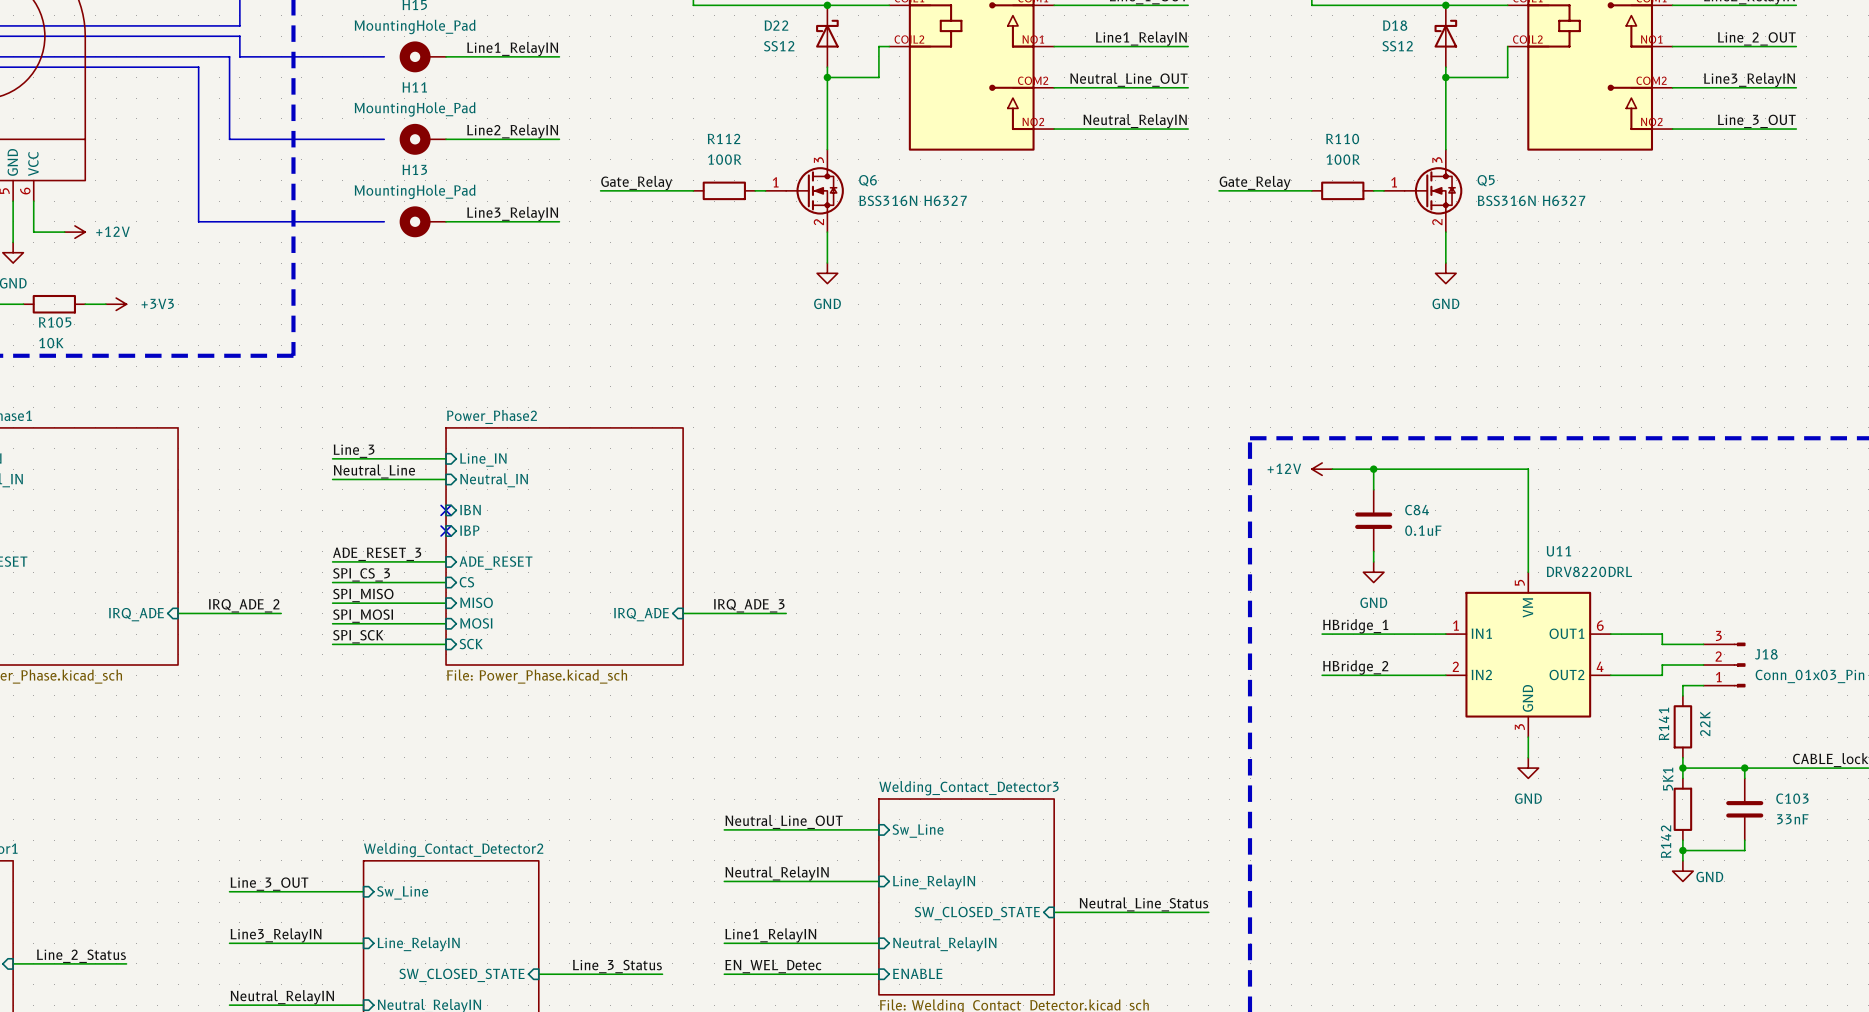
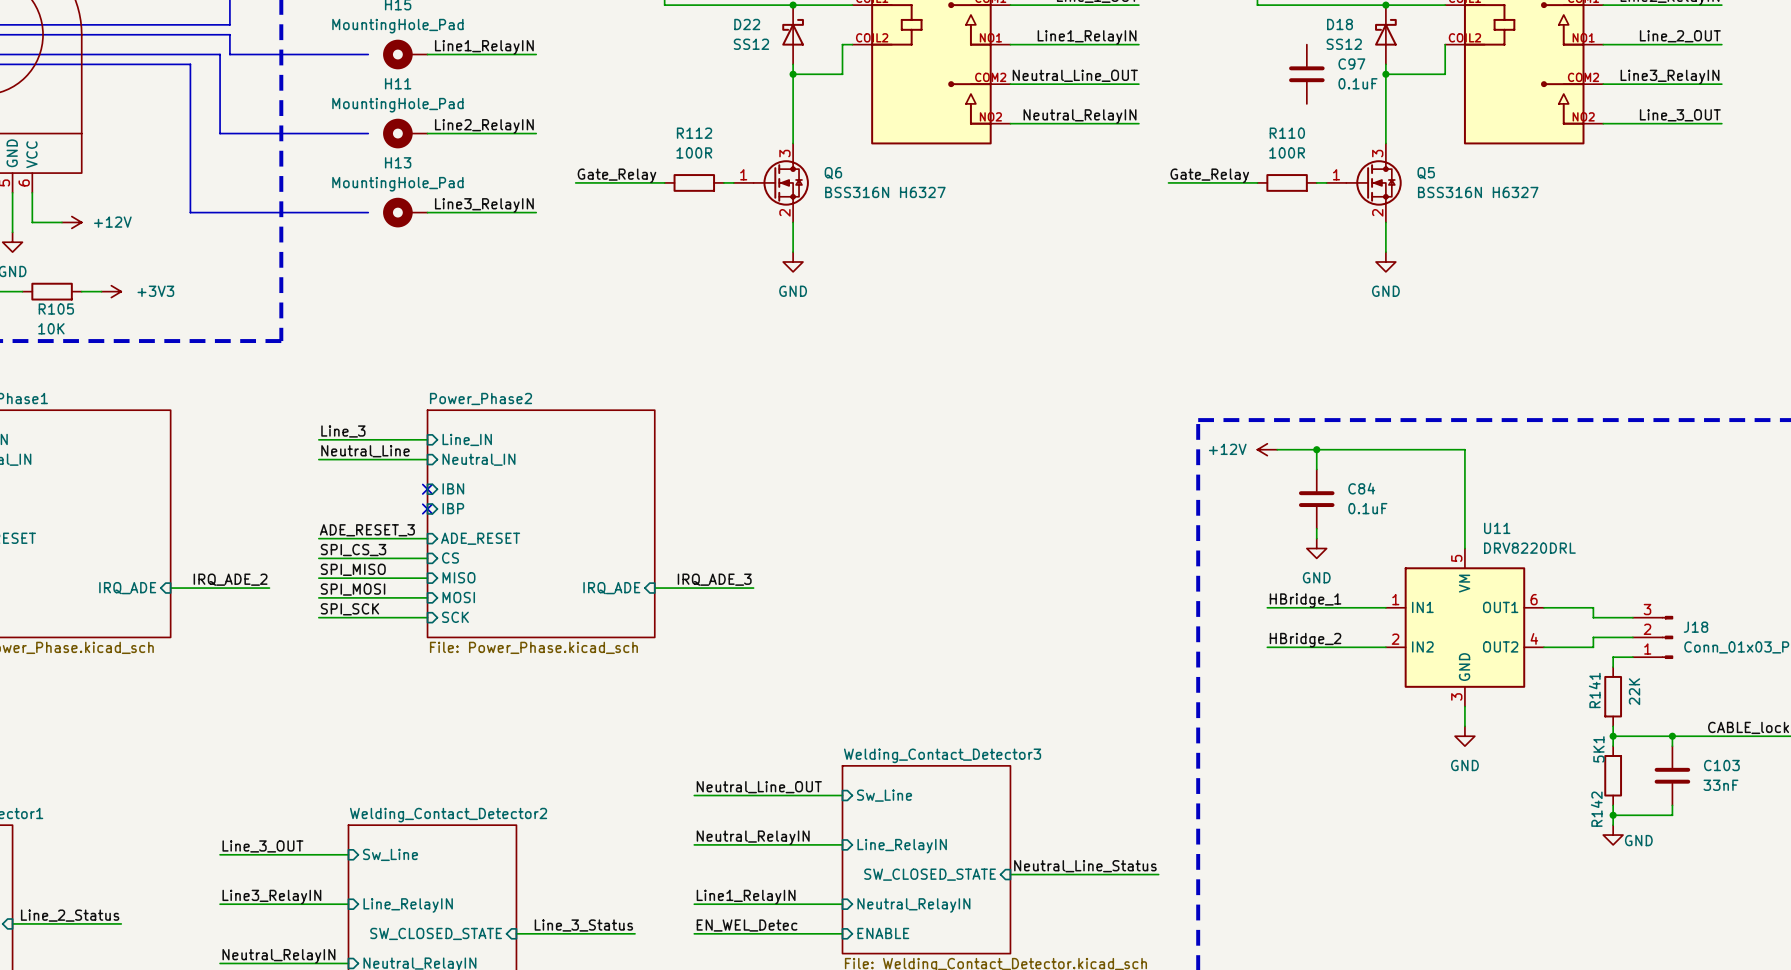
C97: none -> 0.1uF (1306, 74)

